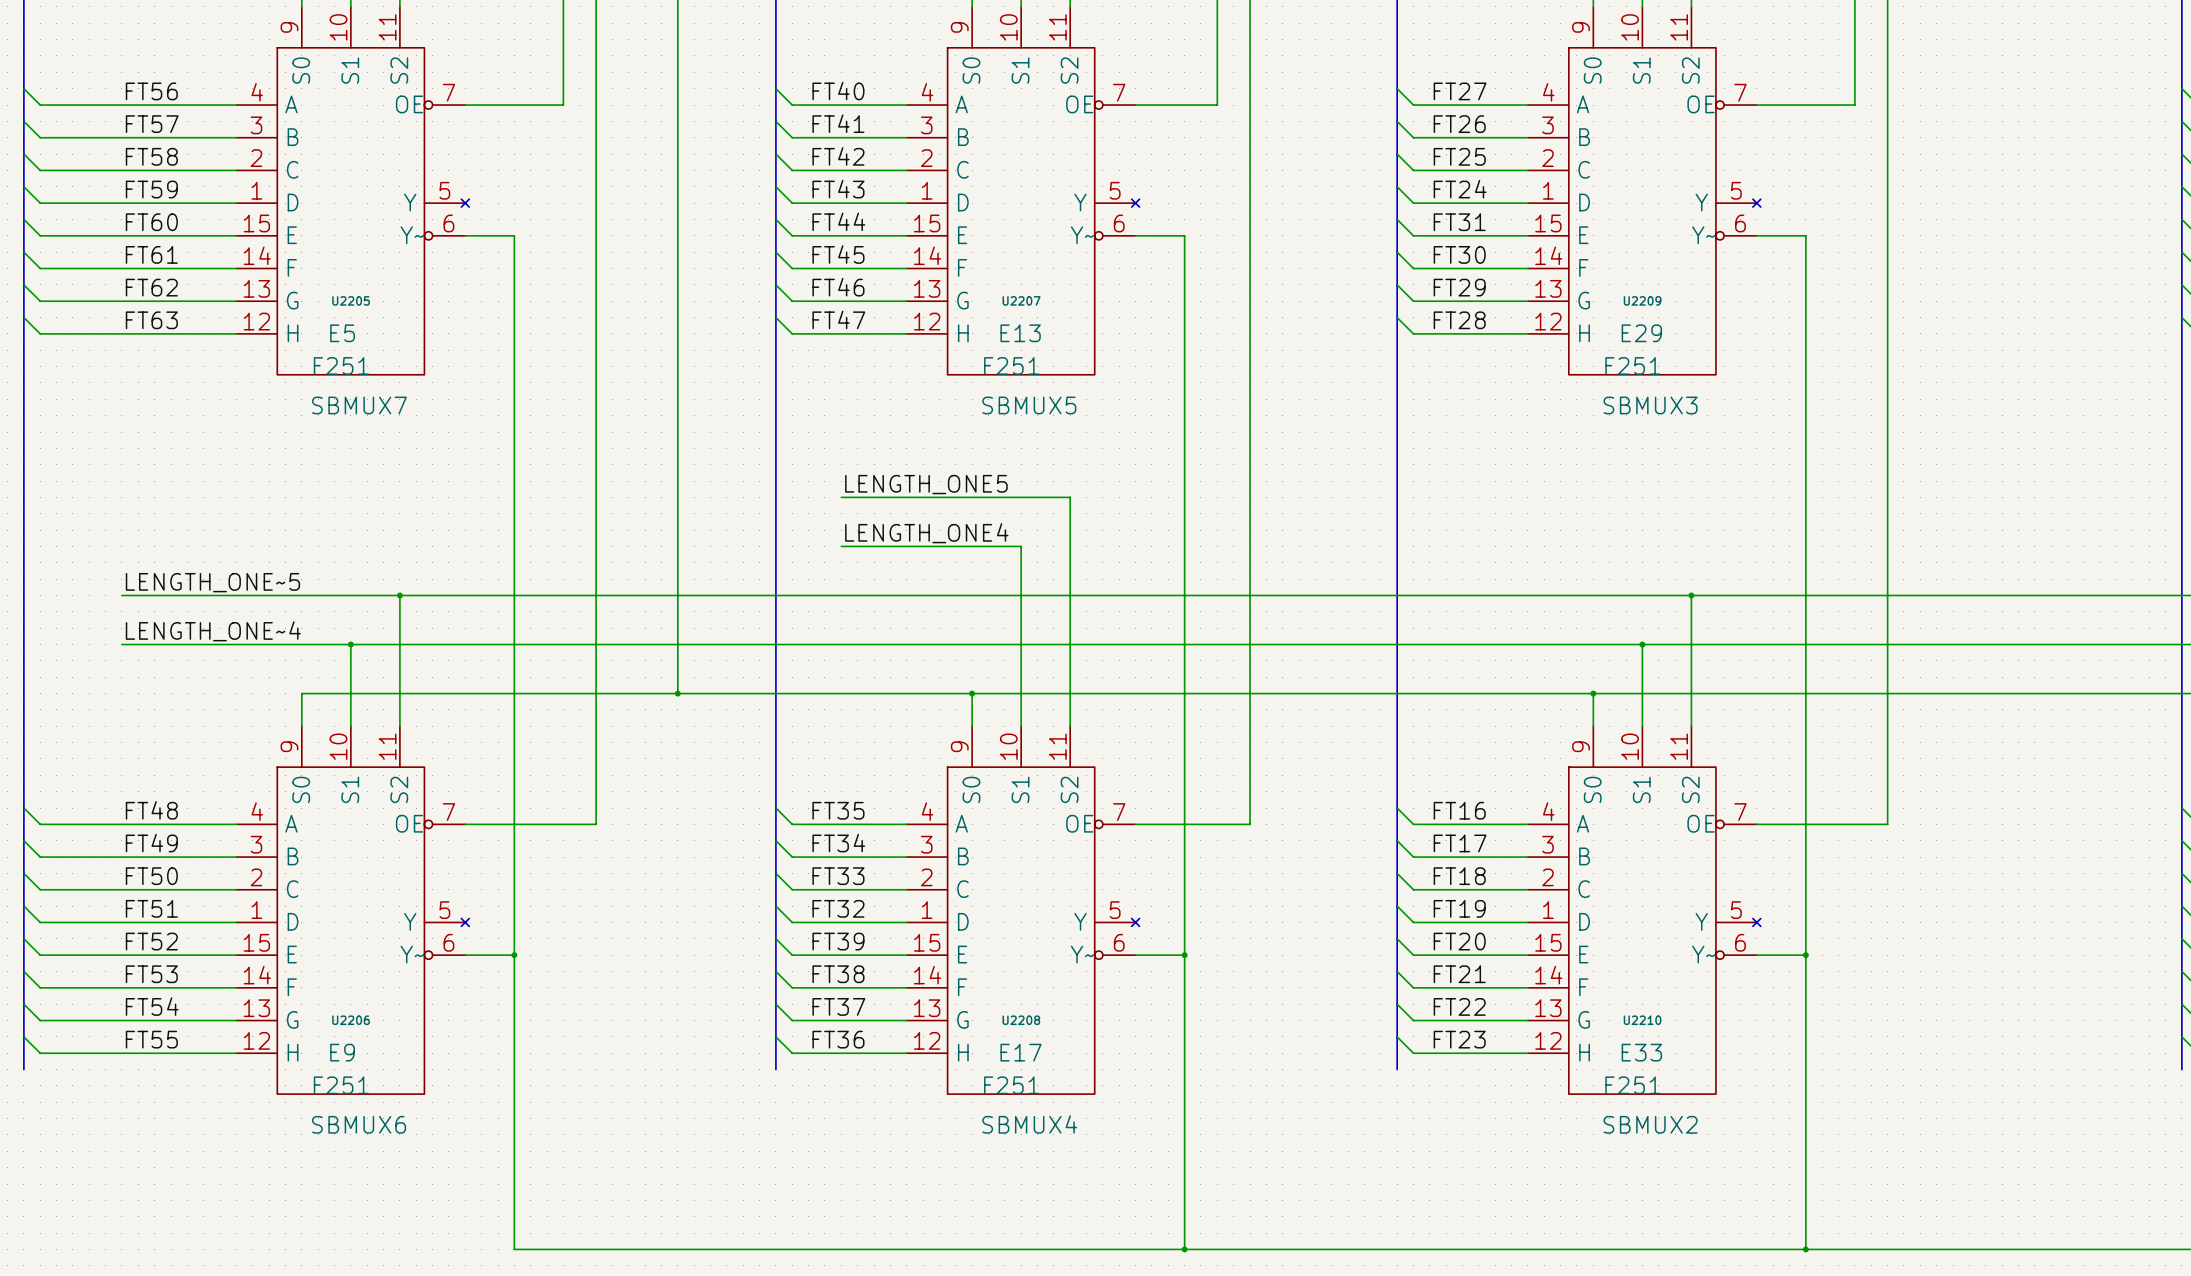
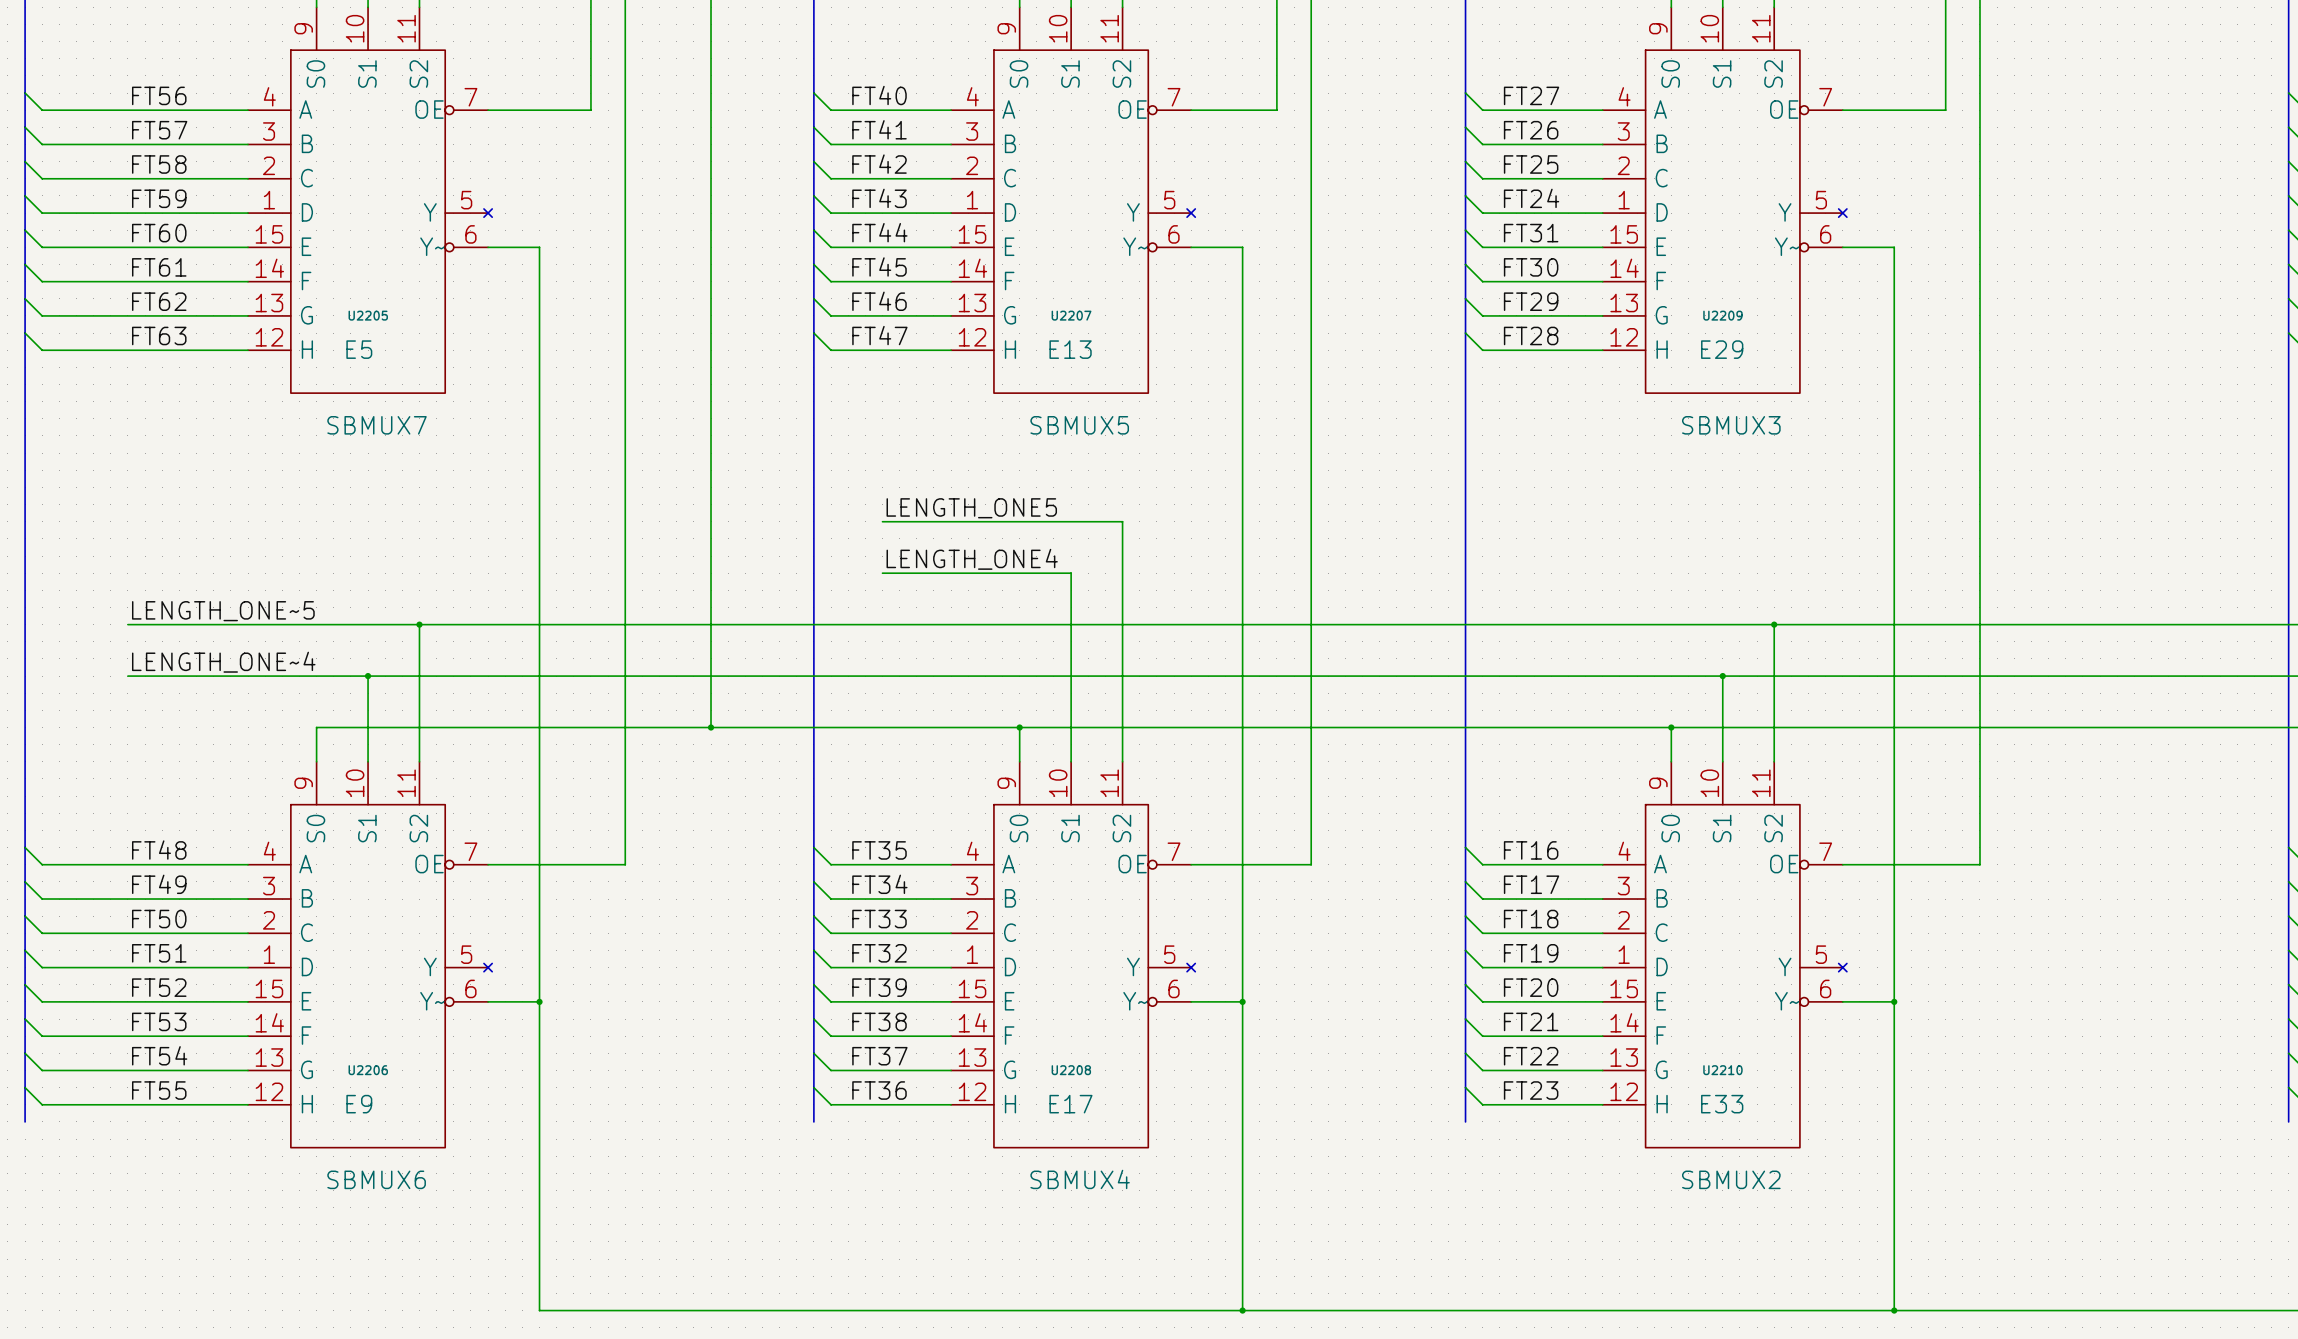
U2205 value: F251 (341, 366) -> none
U2207 value: F251 (1011, 366) -> none
U2209 value: F251 (1632, 366) -> none
U2206 value: F251 (341, 1085) -> none
U2208 value: F251 (1011, 1085) -> none
U2210 value: F251 (1632, 1085) -> none

